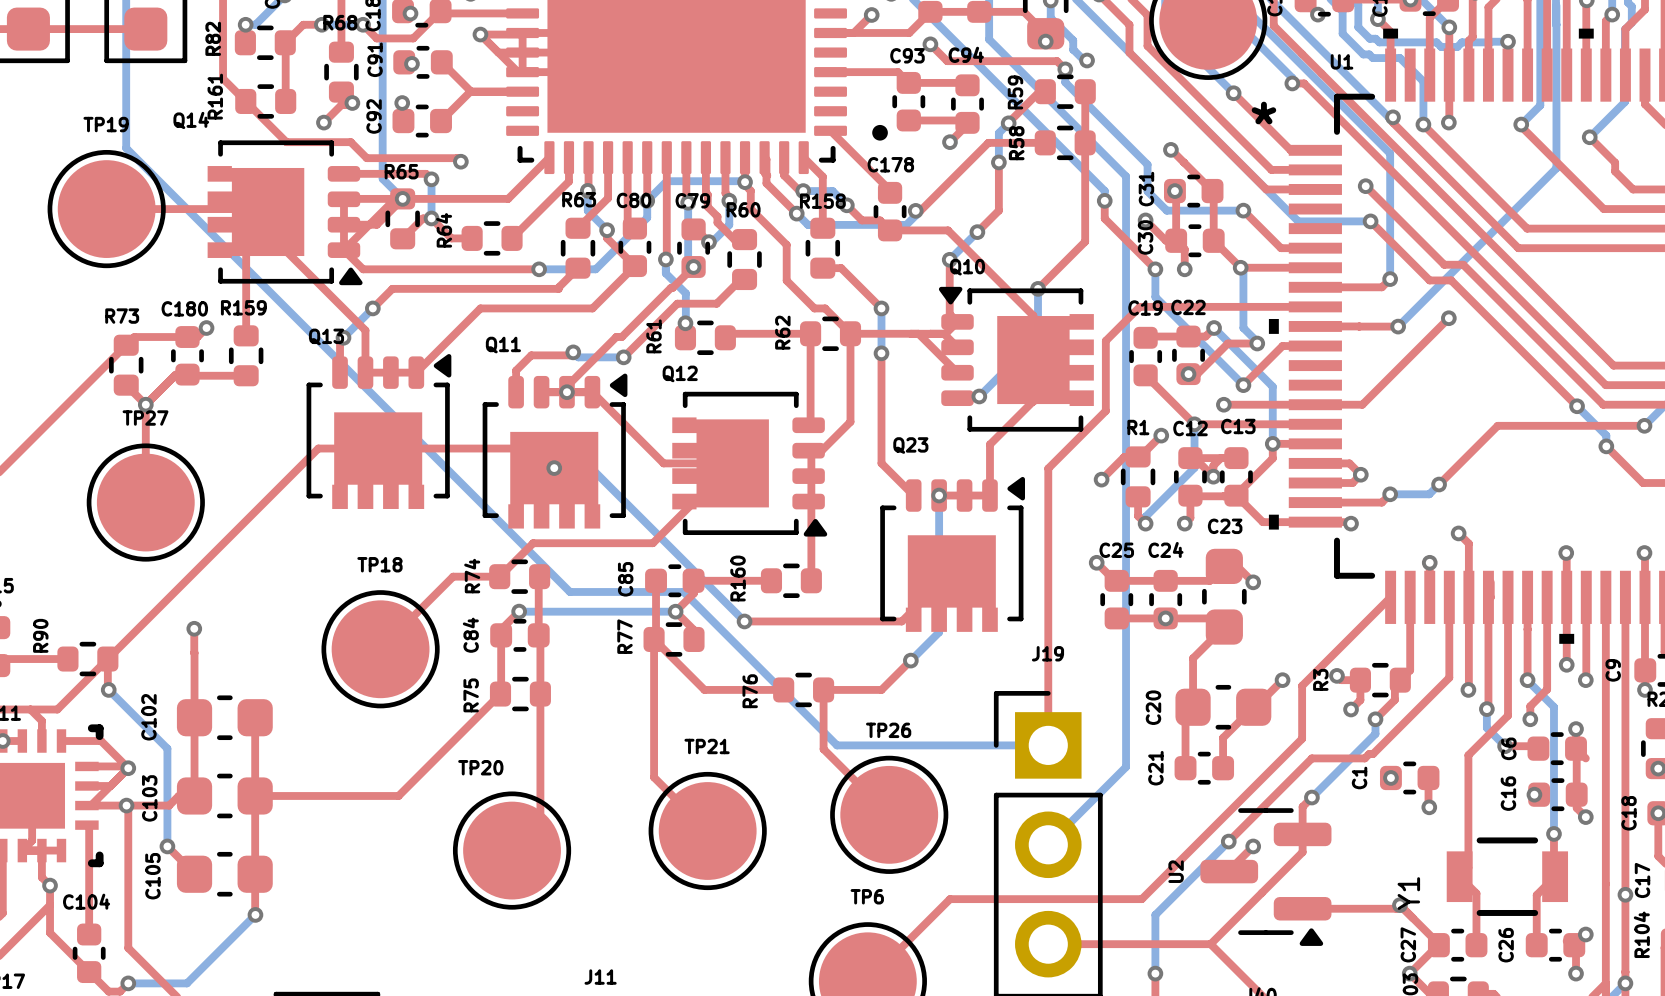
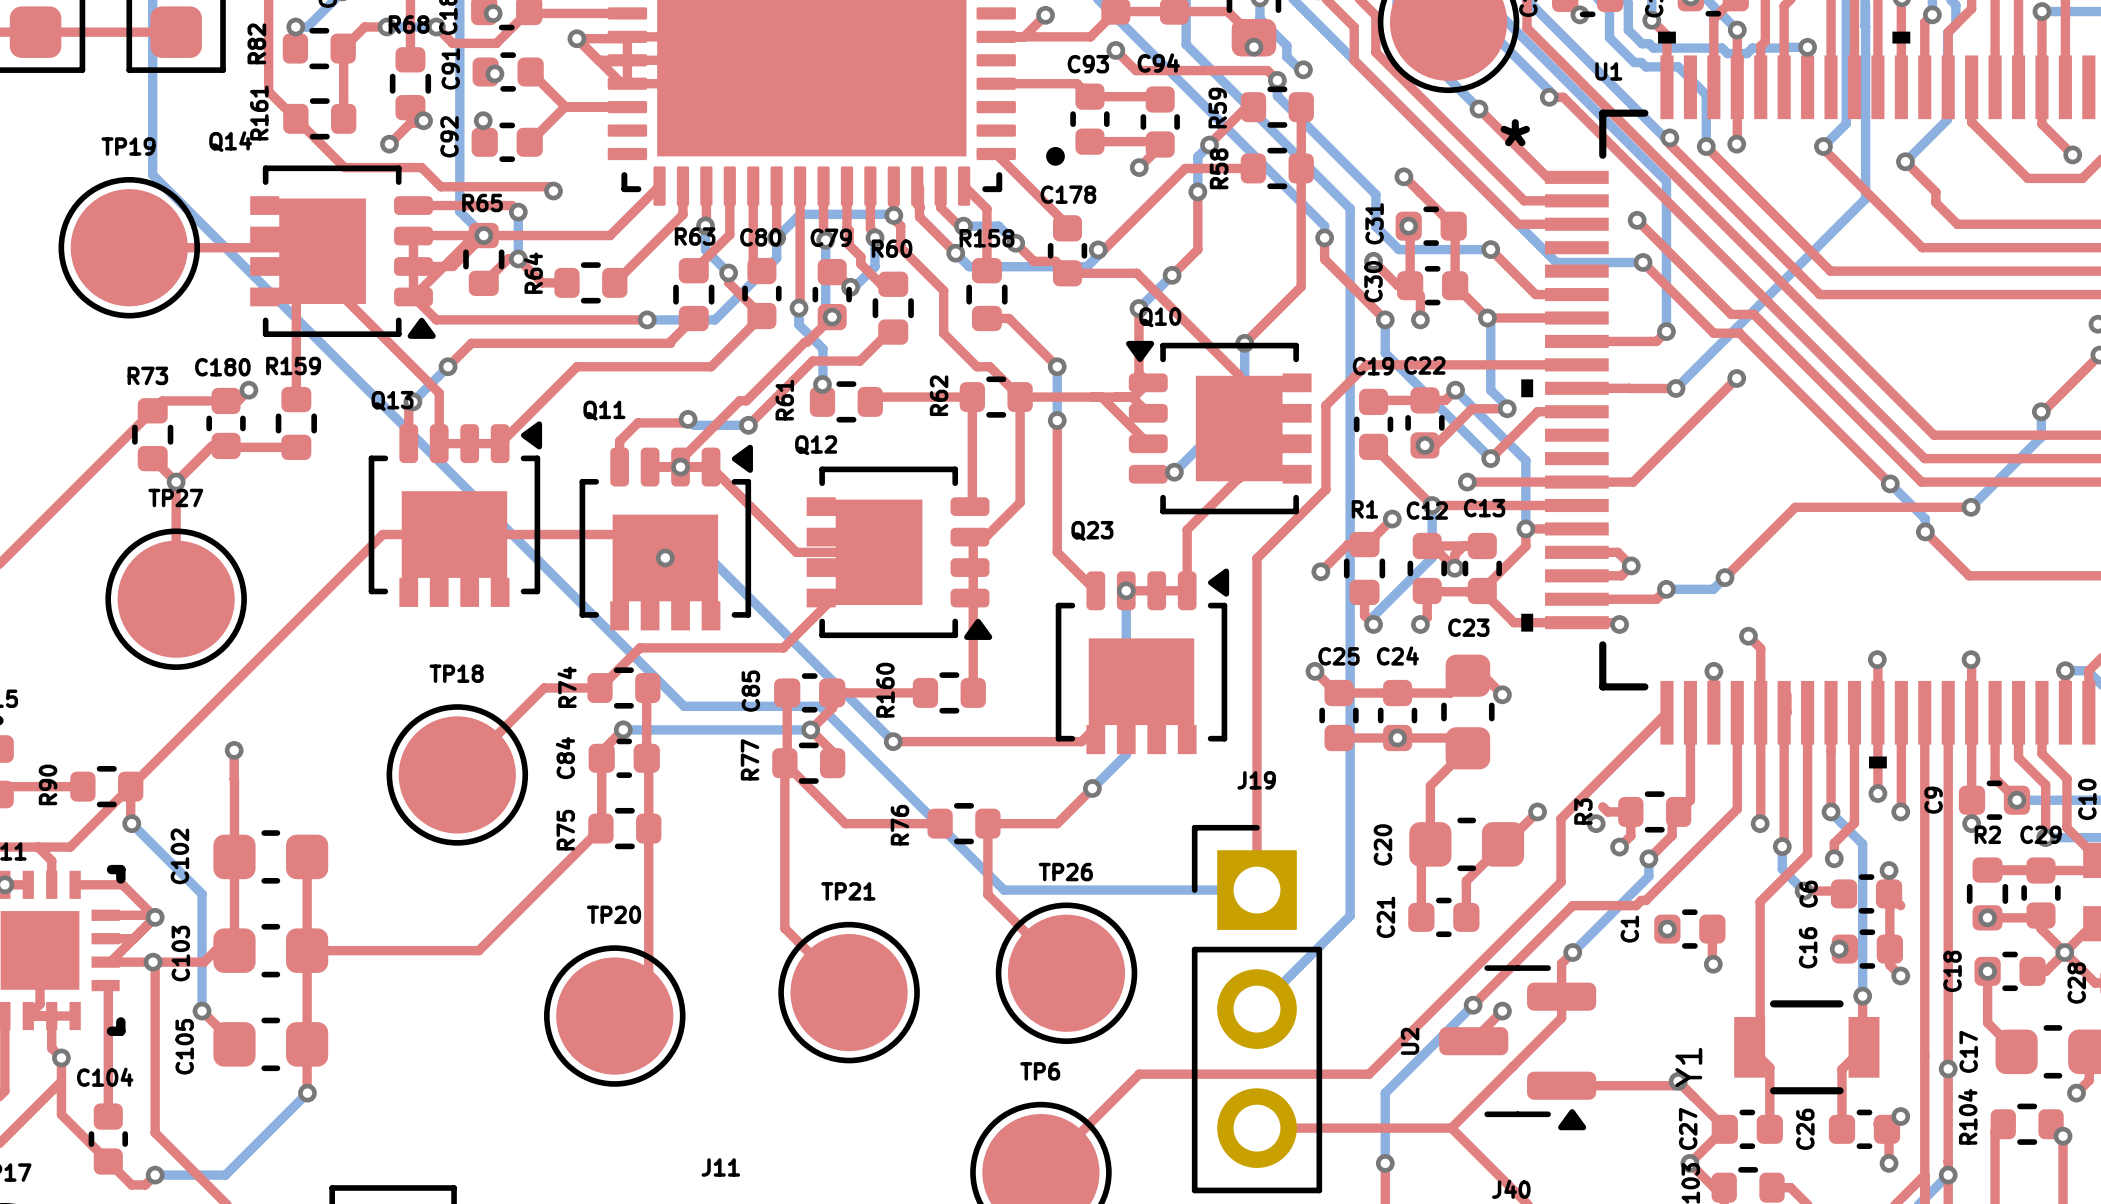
R90 name position: R90 (40, 635) -> R90 (48, 784)
via position: (1336, 675) -> (1596, 823)
TP20 name position: TP20 (480, 767) -> TP20 (614, 914)

